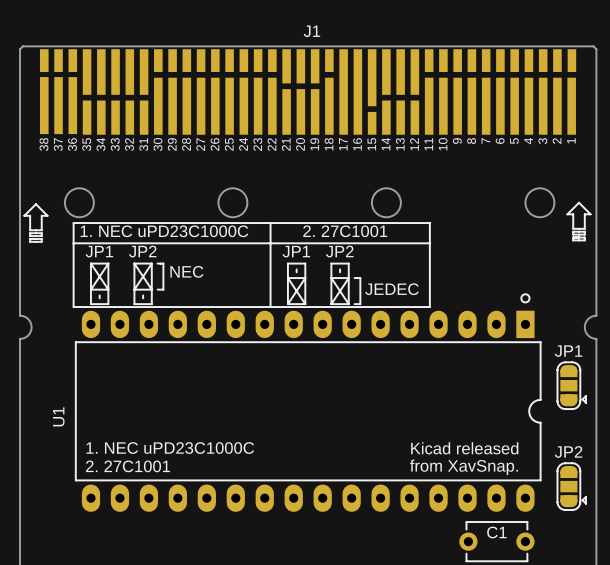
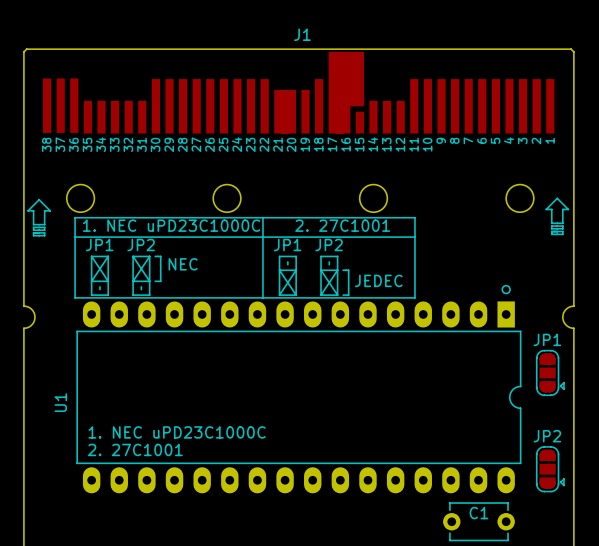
J1 footprint: [40, 49, 577, 135] -> [43, 51, 555, 134]
text: Kicad released (464, 448) -> none
text: from XavSnap. (463, 467) -> none

